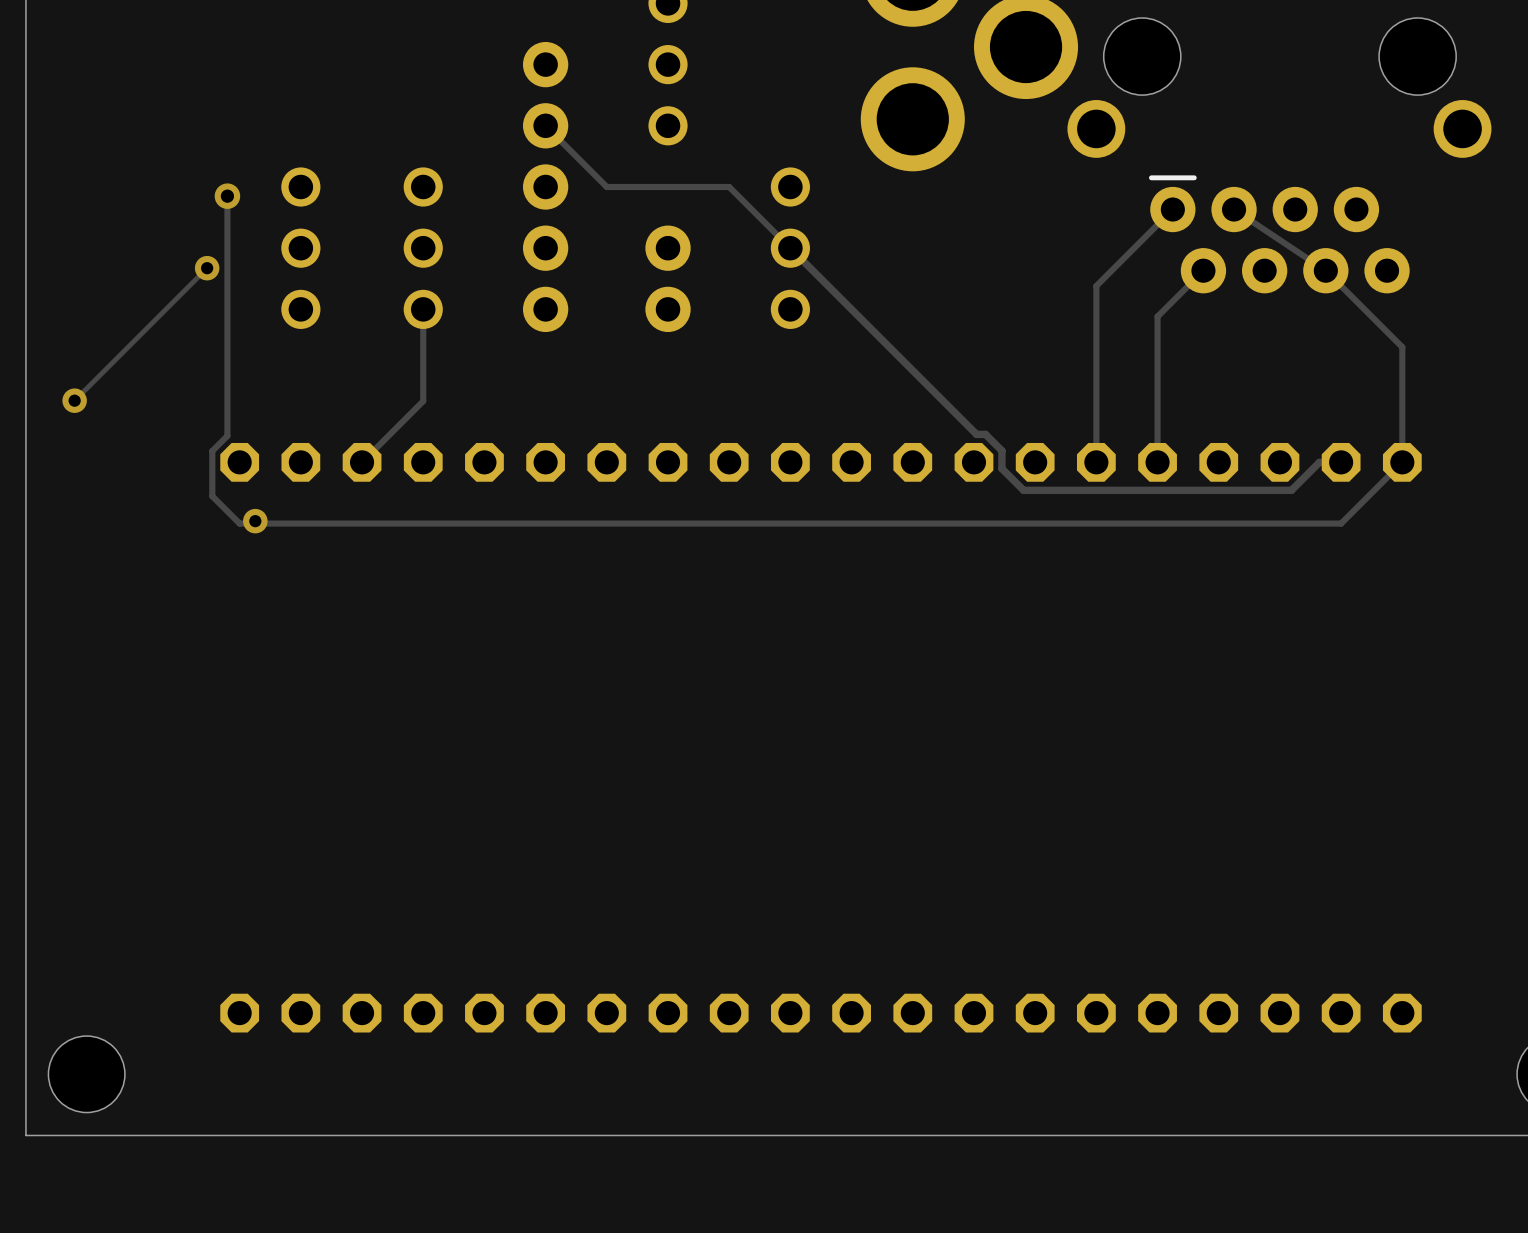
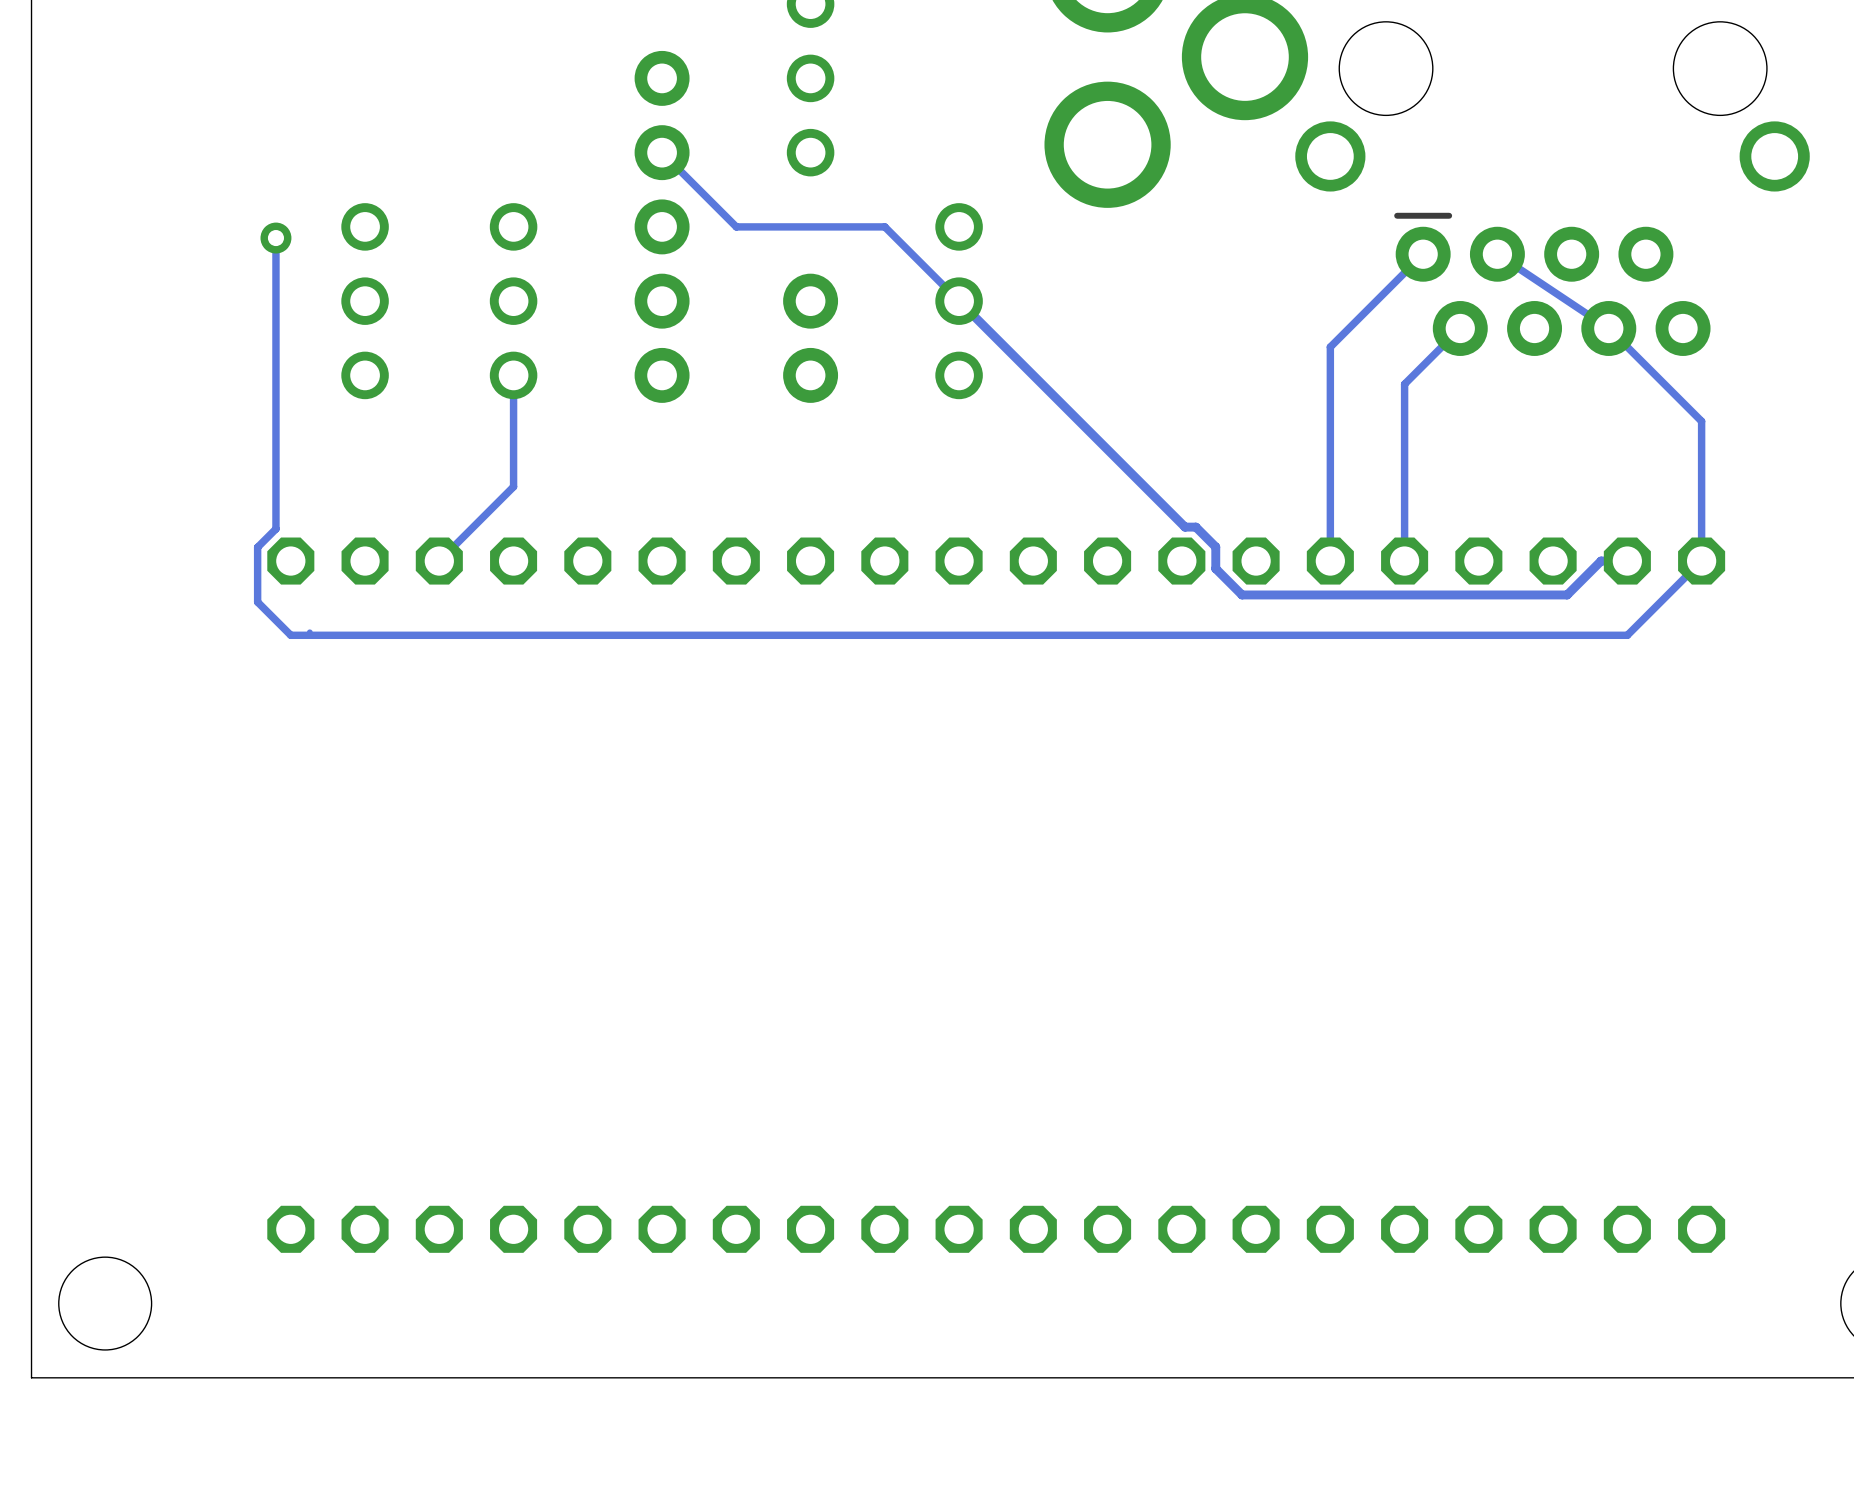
track: (207, 268) (74, 400) -> none
via: (207, 268) -> none
via: (74, 400) -> none
via: (255, 521) -> none

